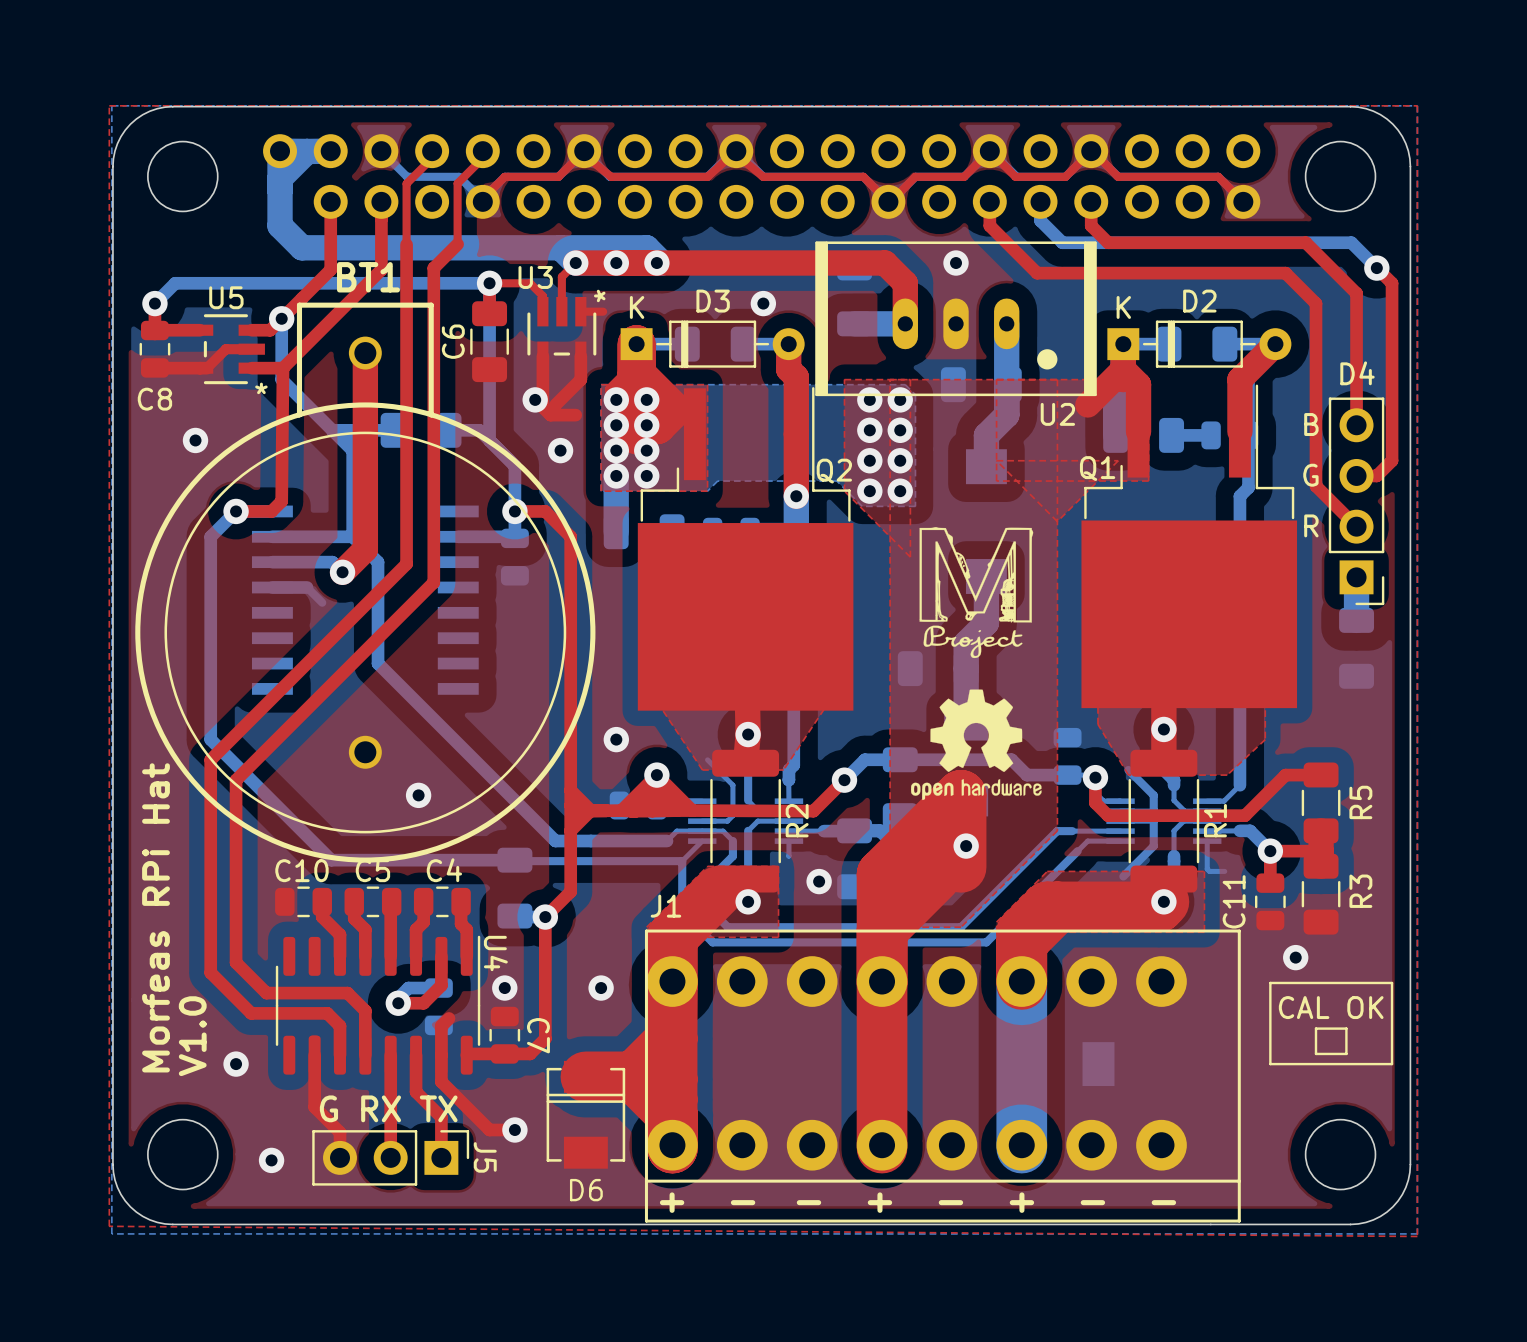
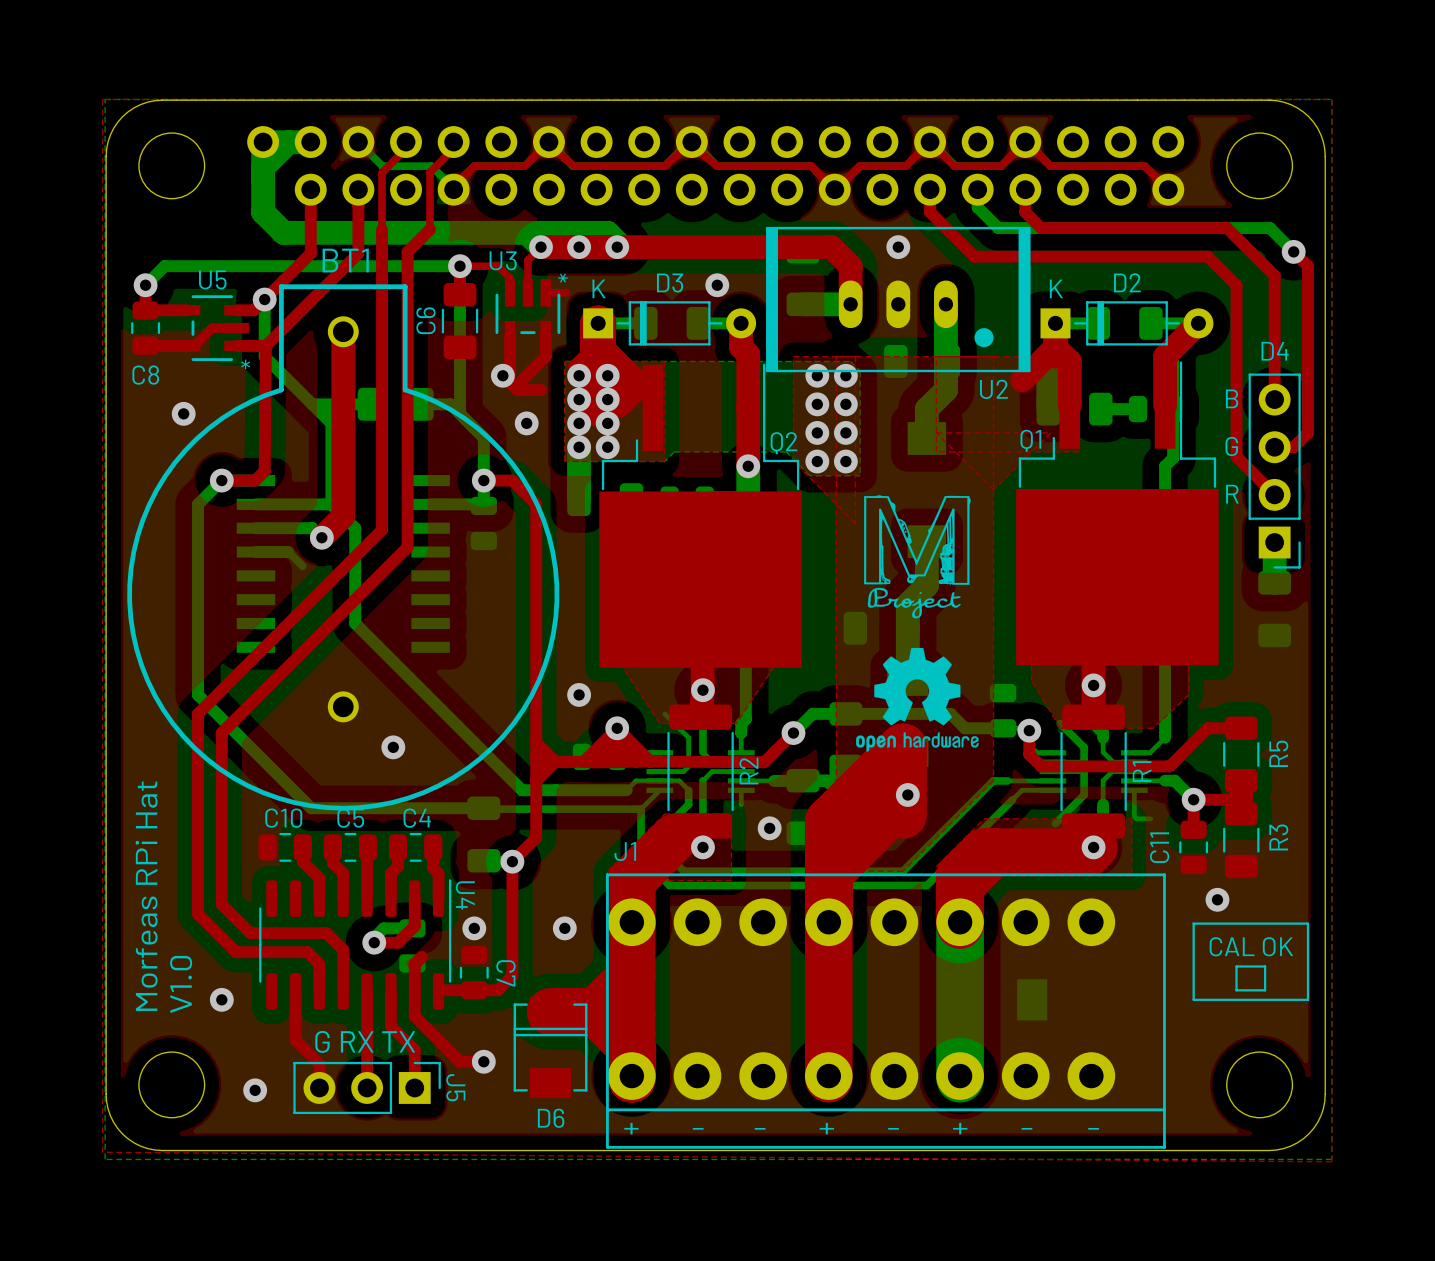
BT1 footprint: [135, 302, 596, 863] -> [127, 284, 560, 811]

